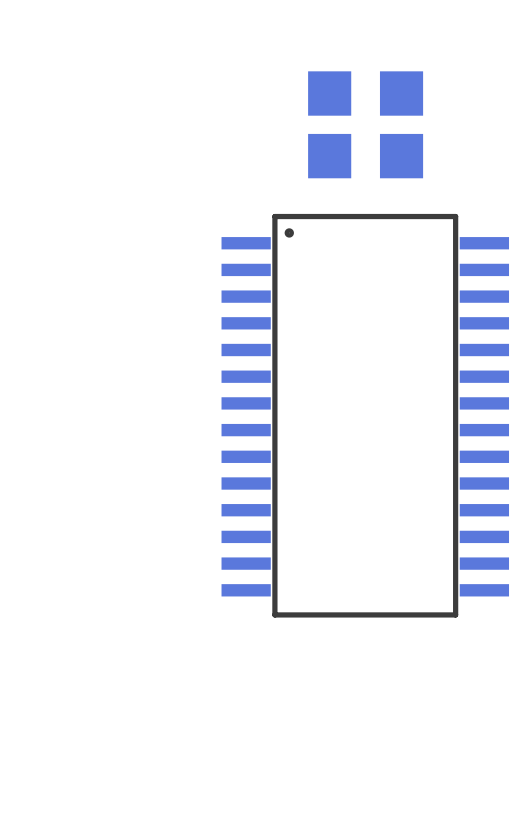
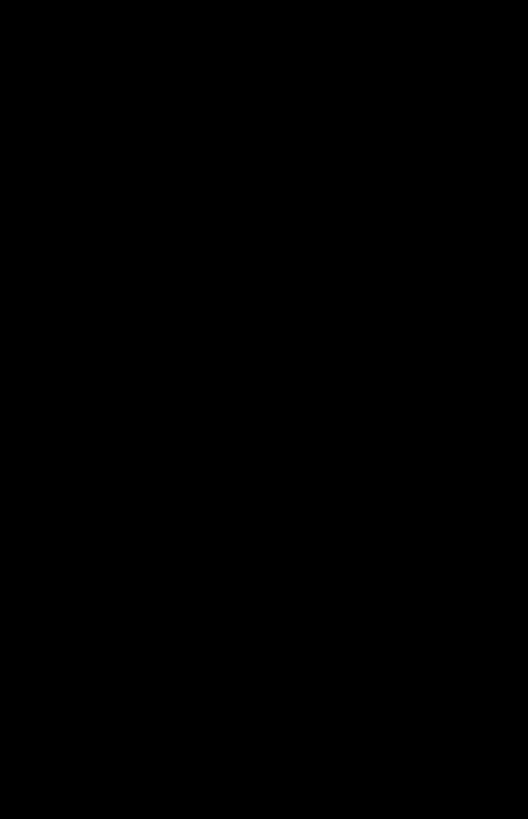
part: (365, 93) -> none
part: (365, 156) -> none
part: (365, 415) -> none

